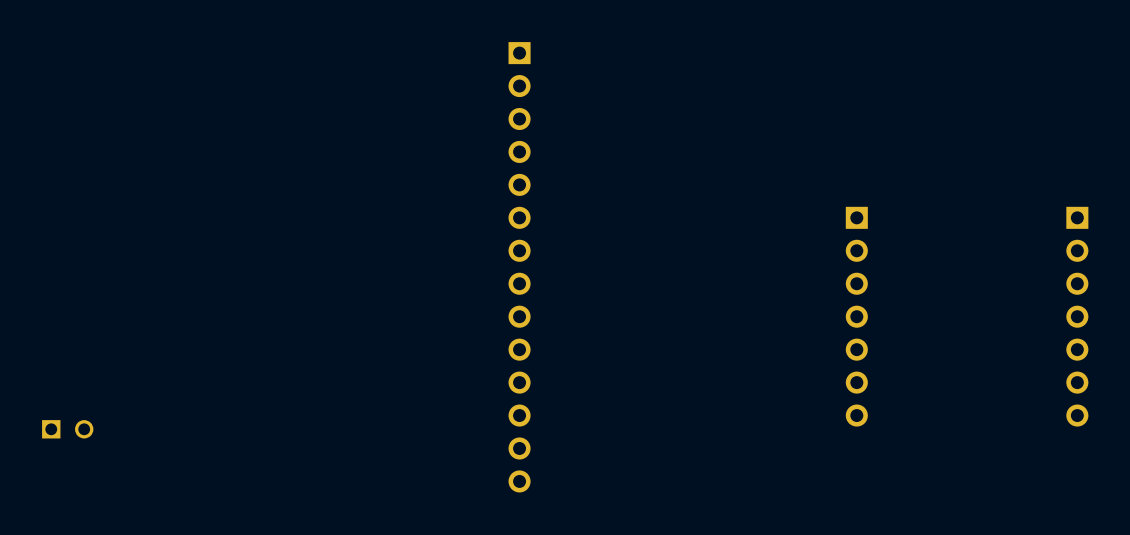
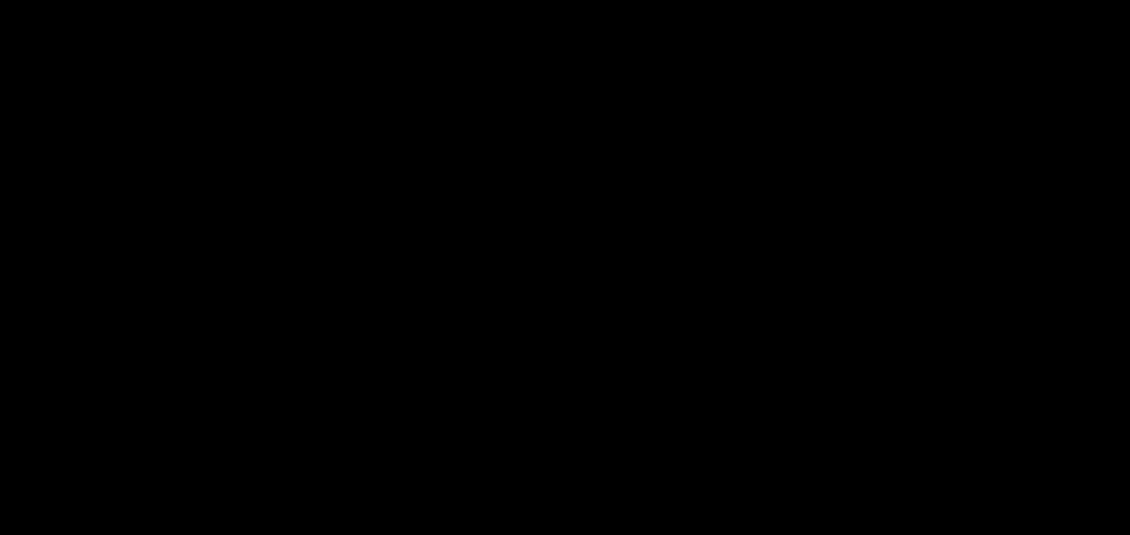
part: (519, 267) -> none
part: (856, 316) -> none
part: (1077, 316) -> none
part: (67, 429) -> none

